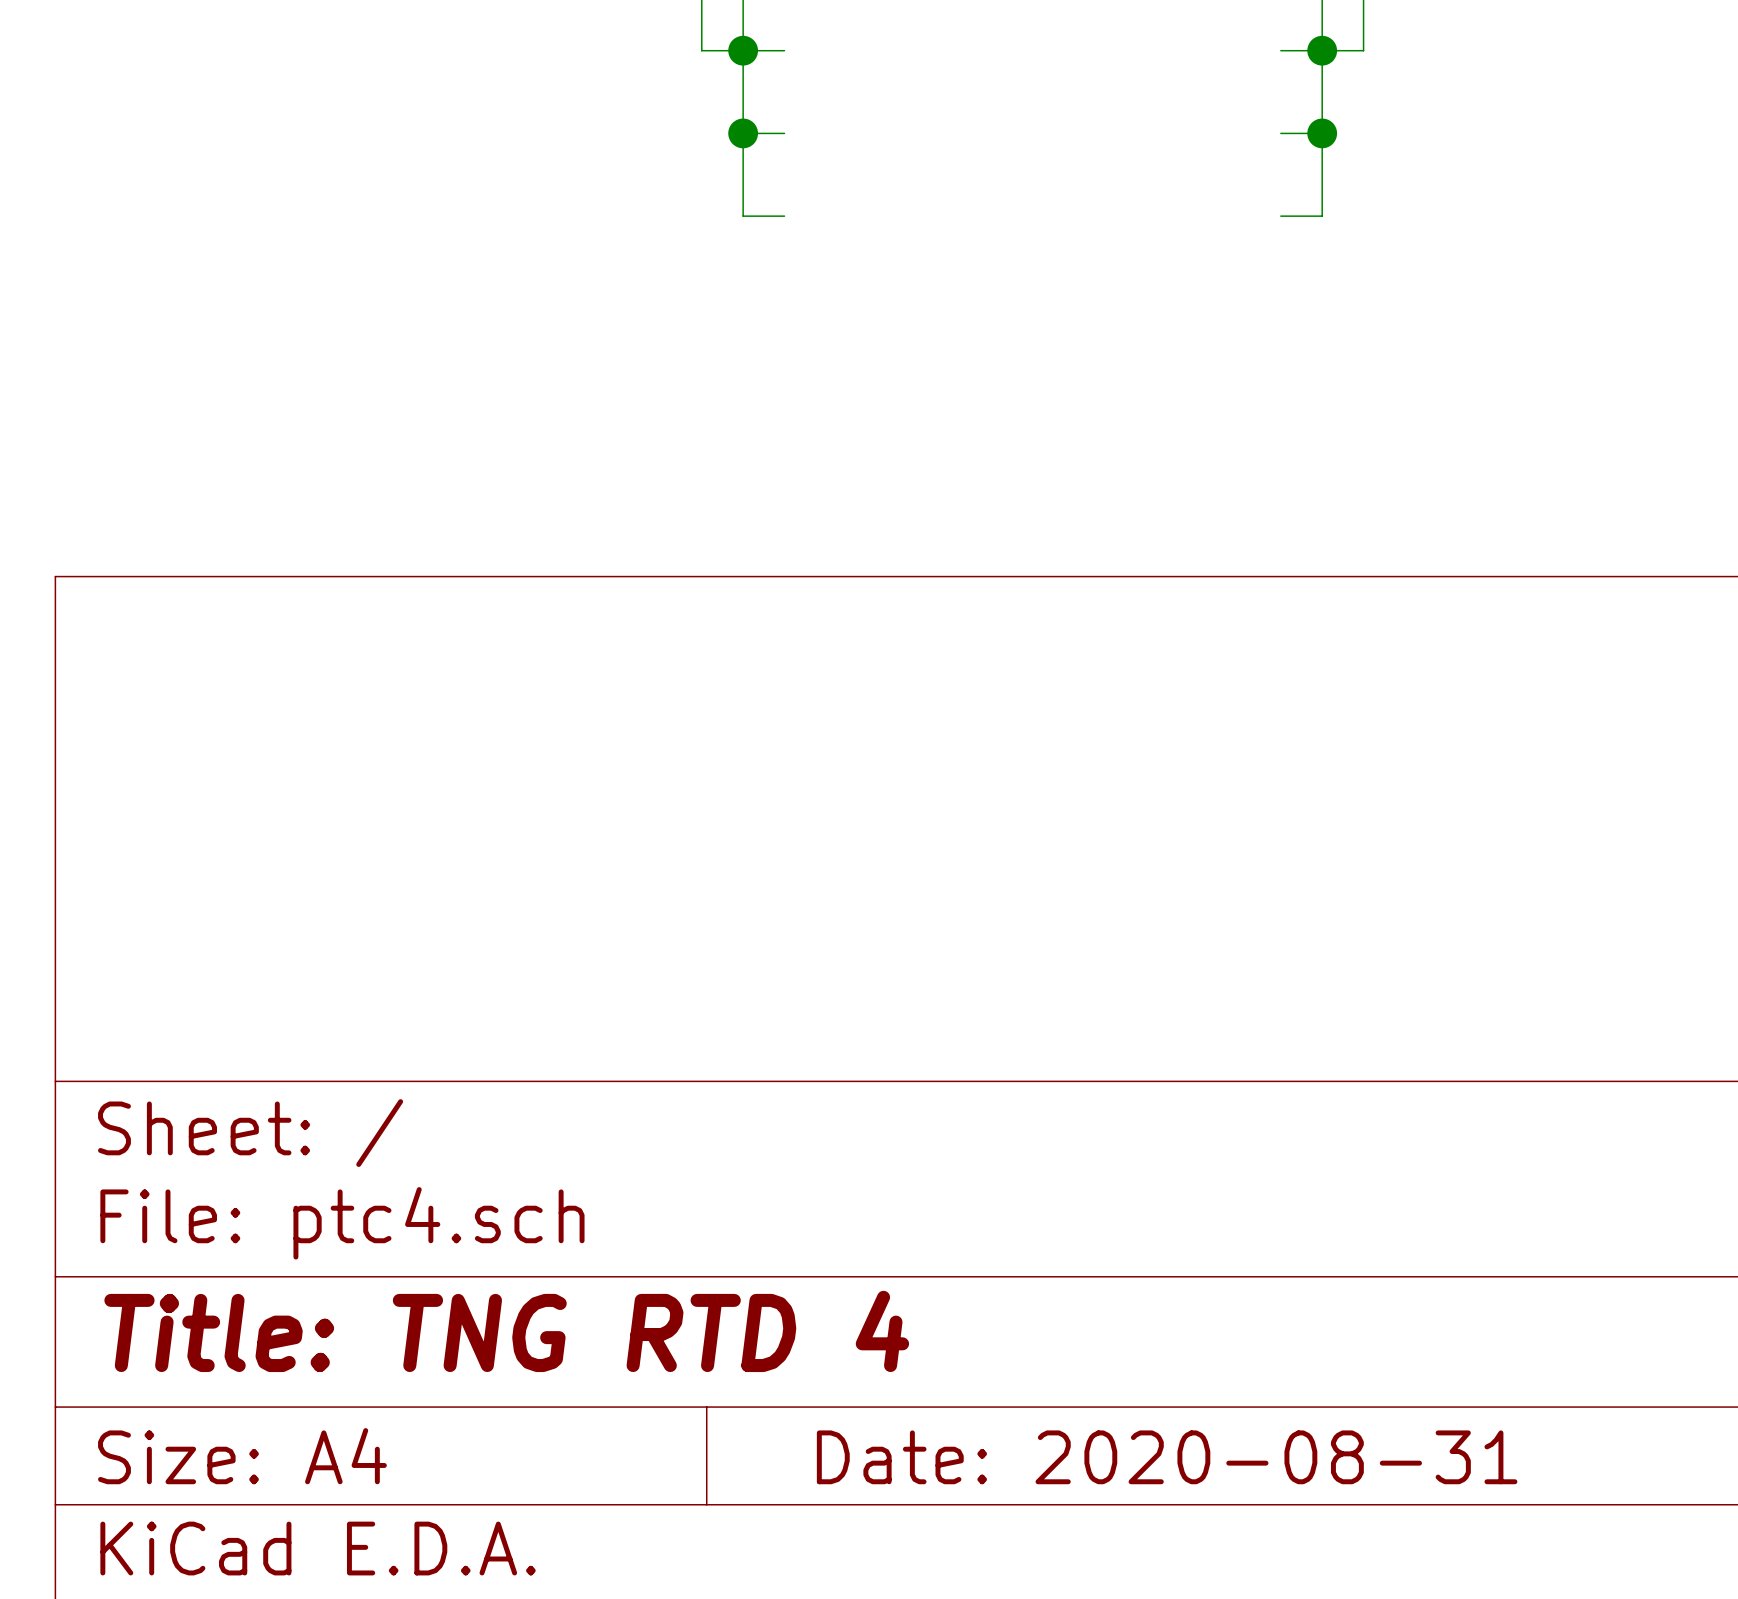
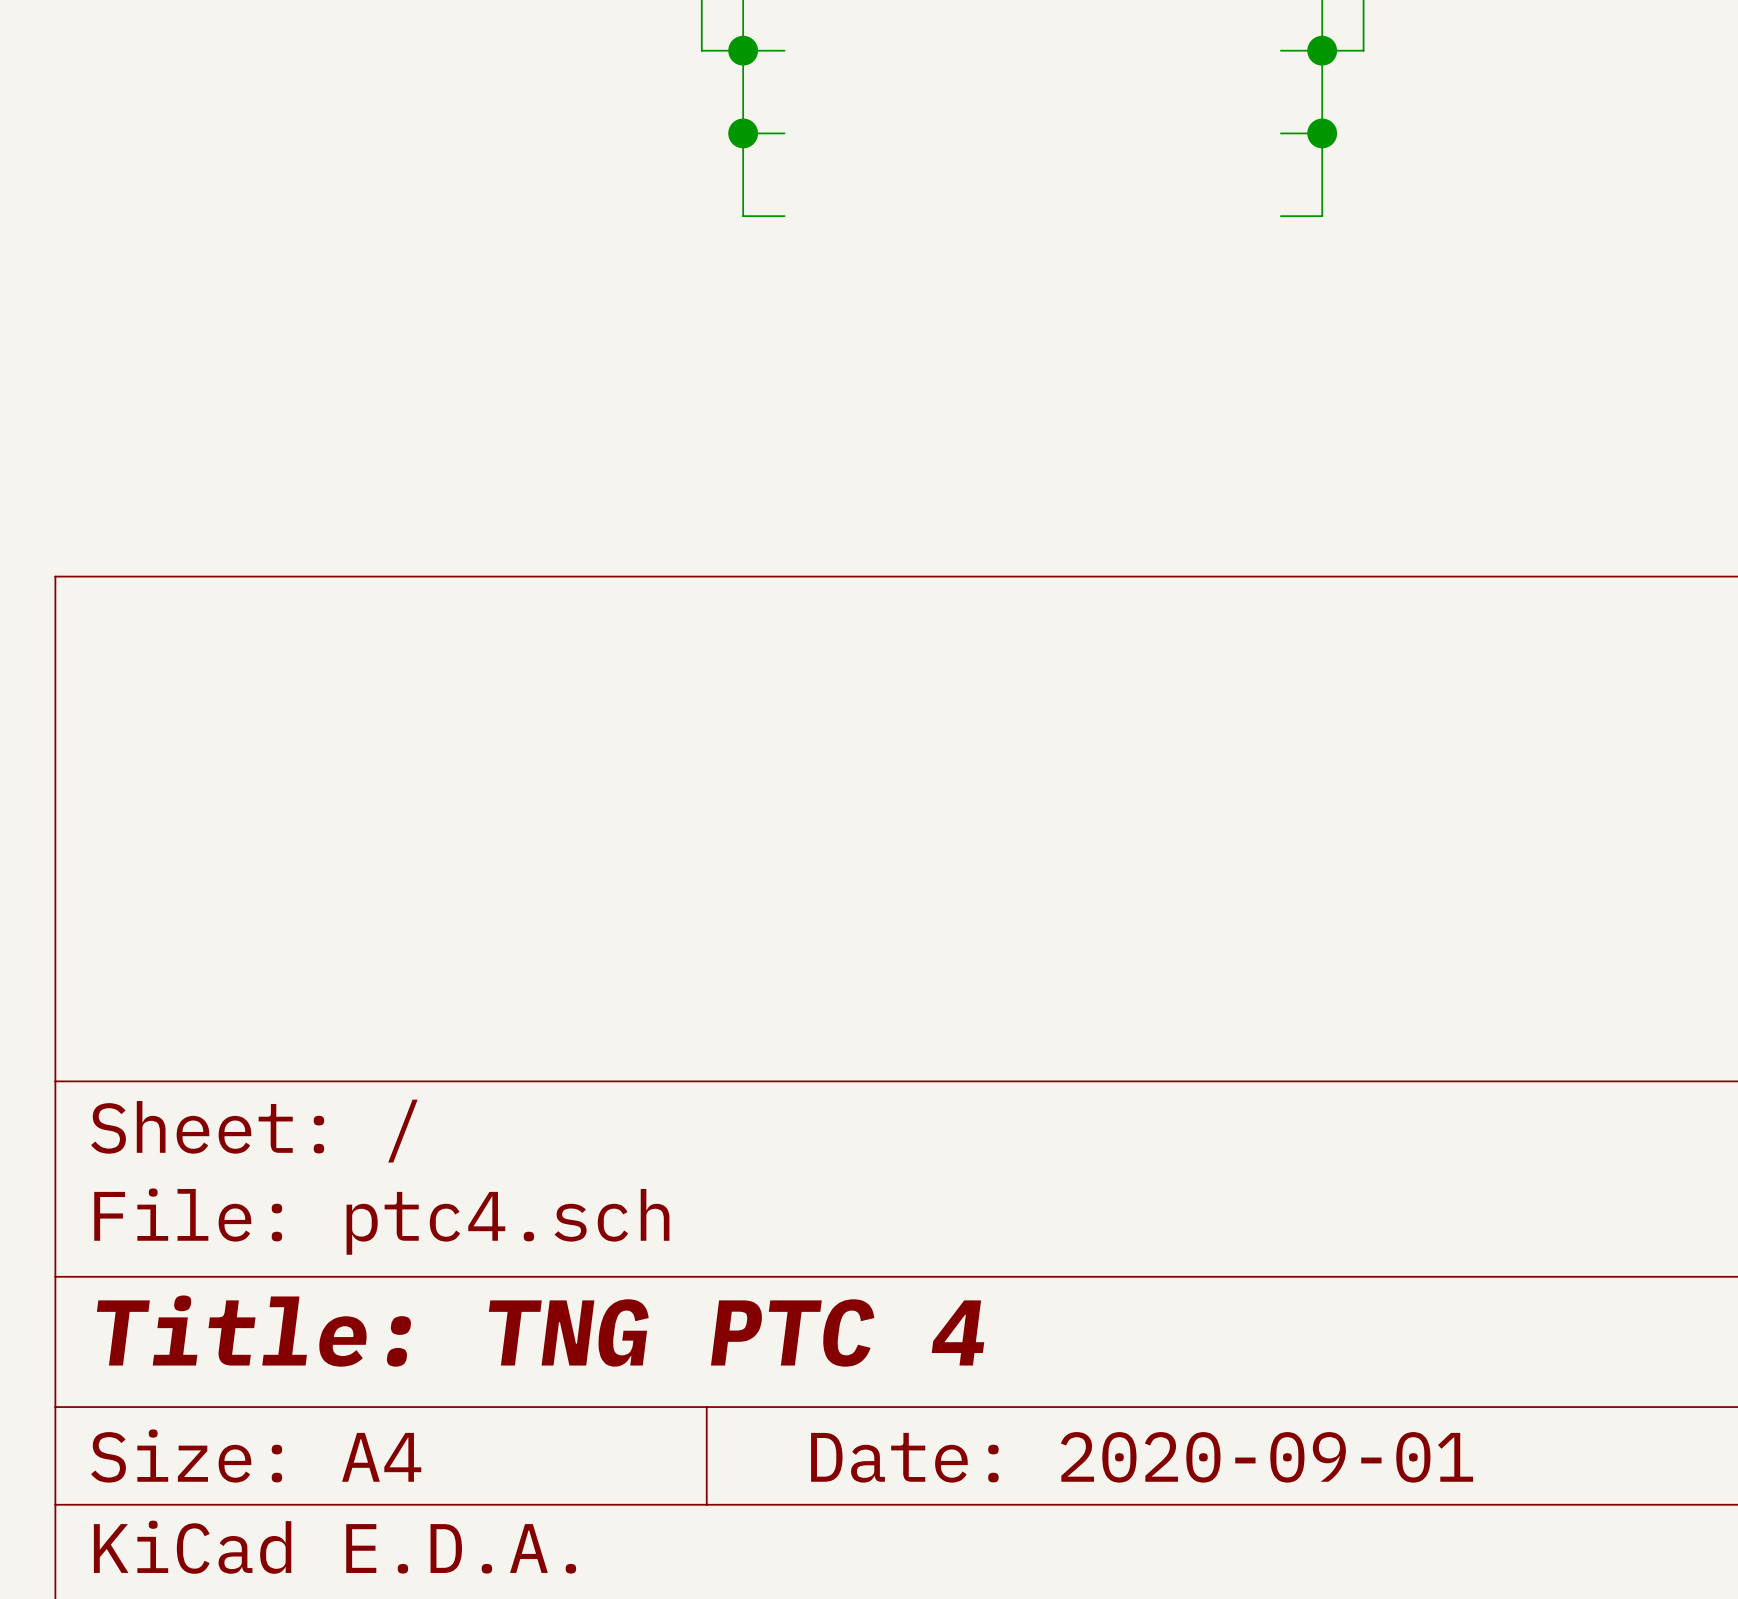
title block: Title: TNG RTD 4 (506, 1331) -> Title: TNG PTC 4 (540, 1331)
title block: Date: 2020-08-31 (1167, 1457) -> Date: 2020-09-01 (1142, 1457)

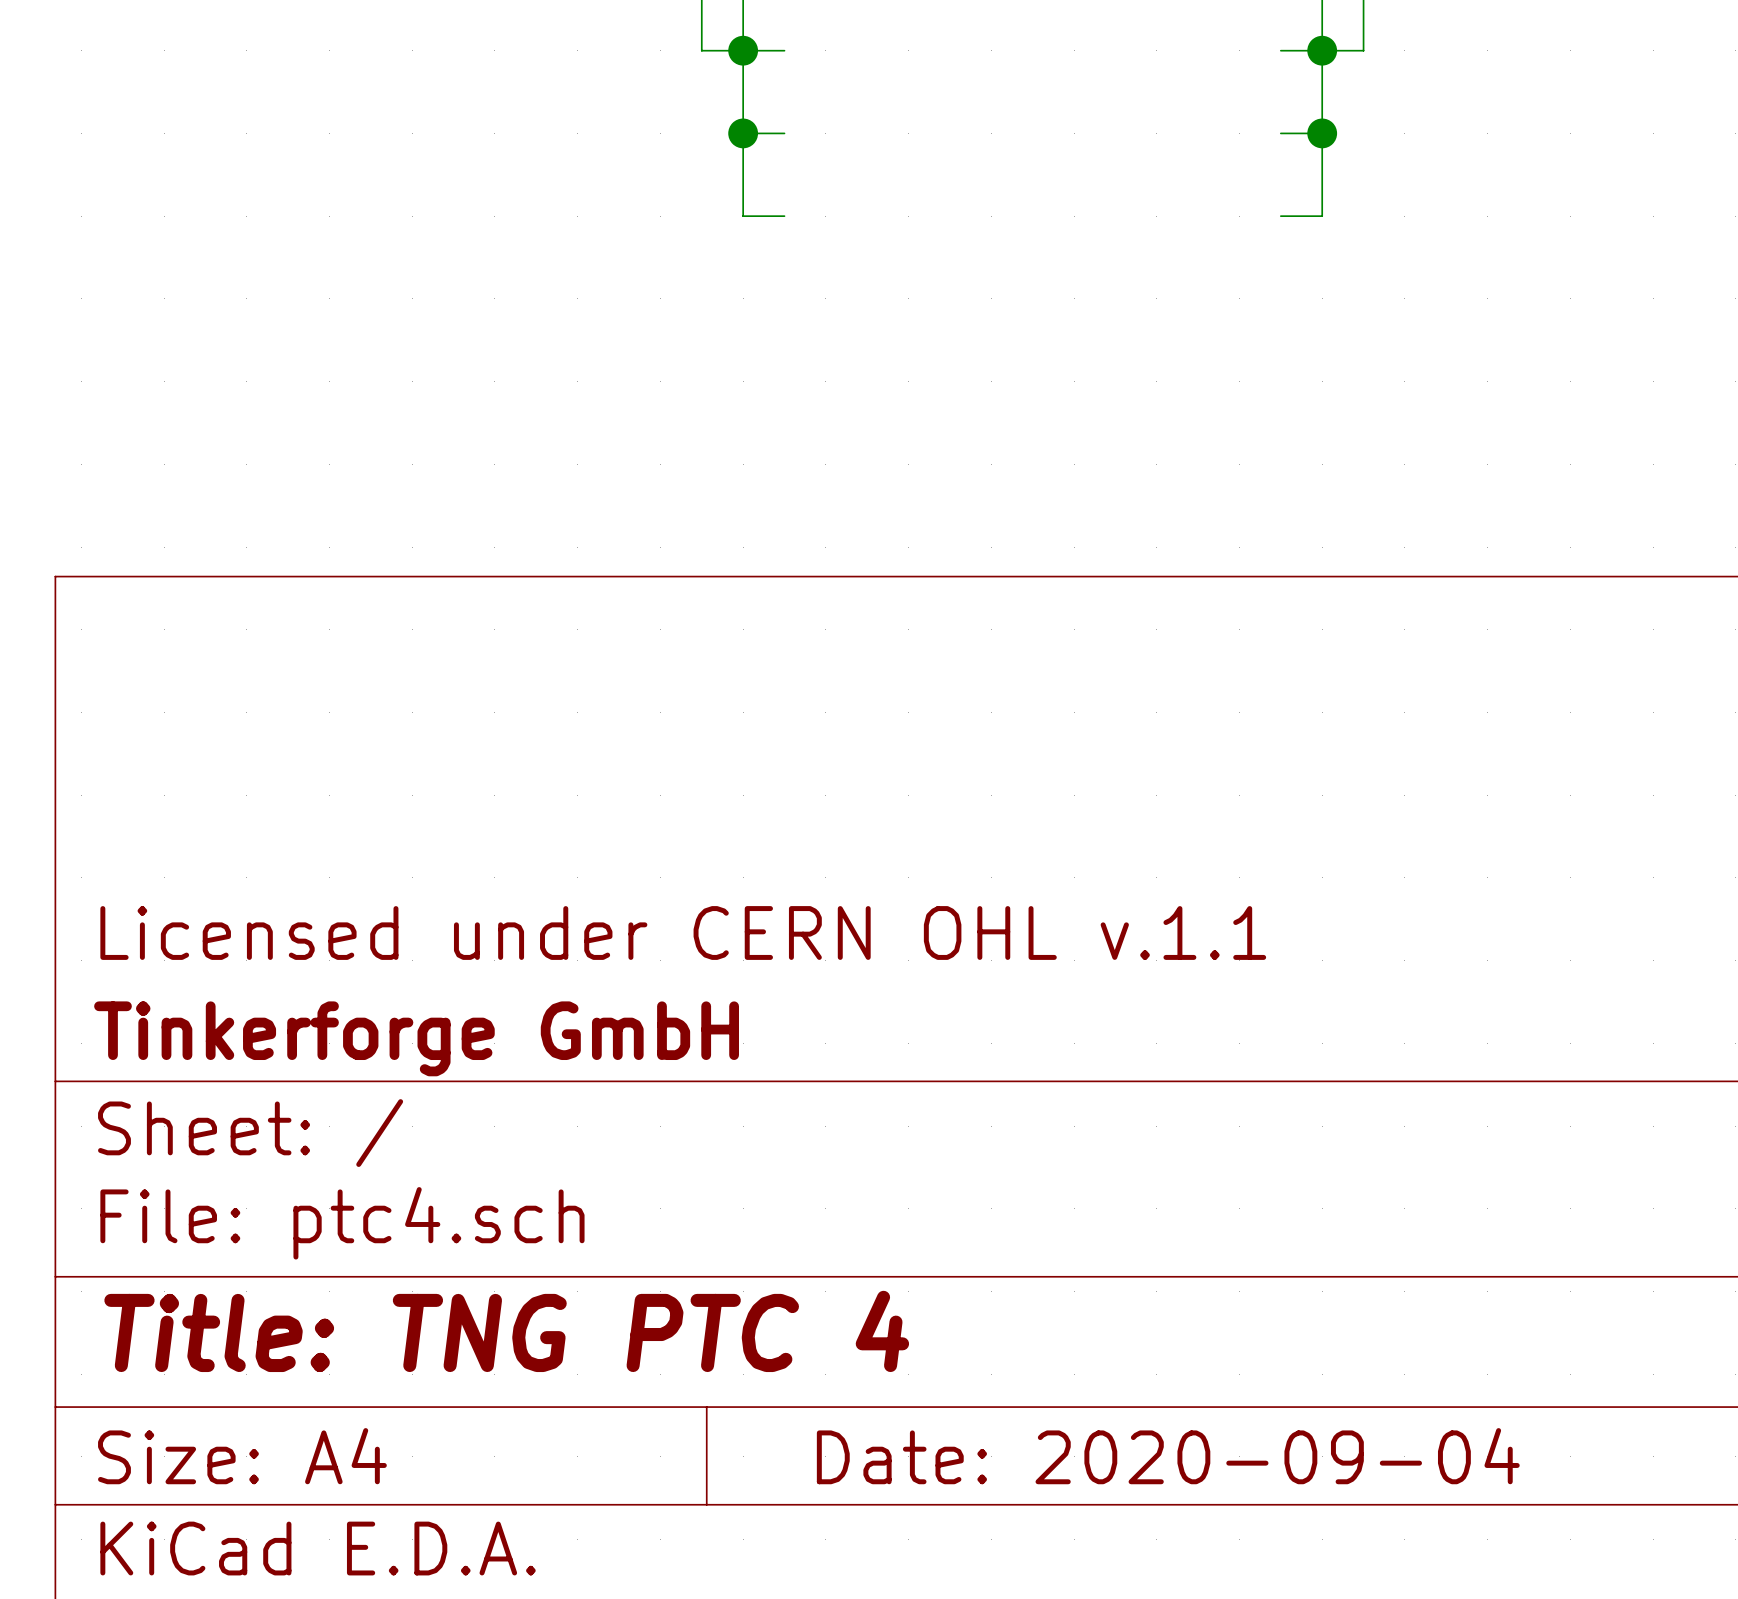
title block: none -> Licensed under CERN OHL v.1.1 (683, 932)
title block: none -> Tinkerforge GmbH (416, 1038)
title block: Date: 2020-09-01 (1142, 1457) -> Date: 2020-09-04 (1168, 1456)

